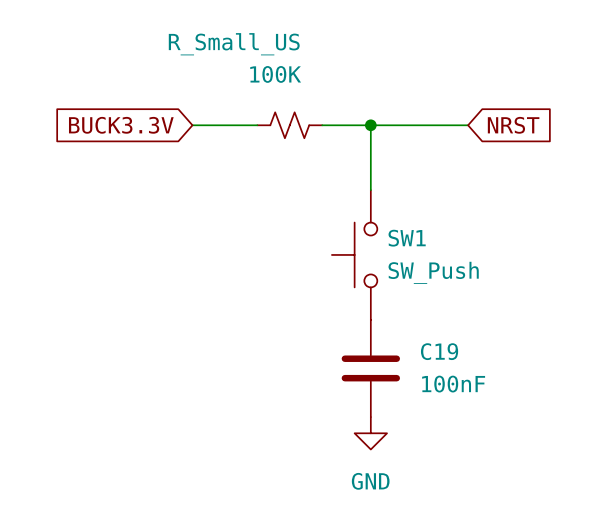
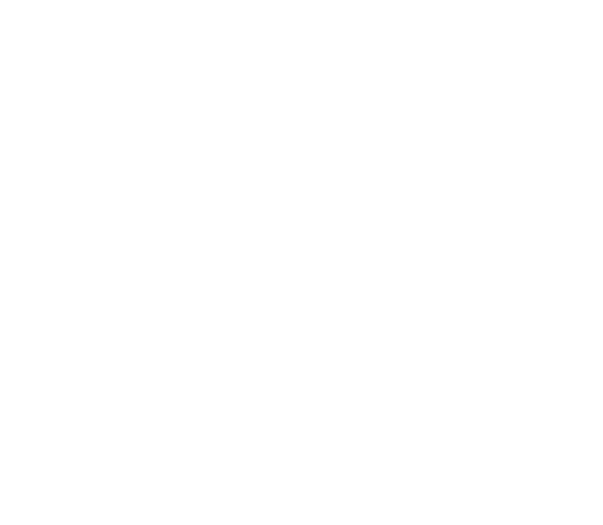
global label: BUCK3.3V (121, 125) -> none
wire: (192, 125) (257, 125) -> none
100K: R_Small_US (289, 125) -> none
wire: (322, 125) (468, 125) -> none
wire: (370, 125) (370, 190) -> none
junction: (370, 125) -> none
global label: NRST (513, 125) -> none
SW1: SW_Push (354, 254) -> none
C19: 100nF (370, 368) -> none
power symbol: GND (370, 433) -> none

